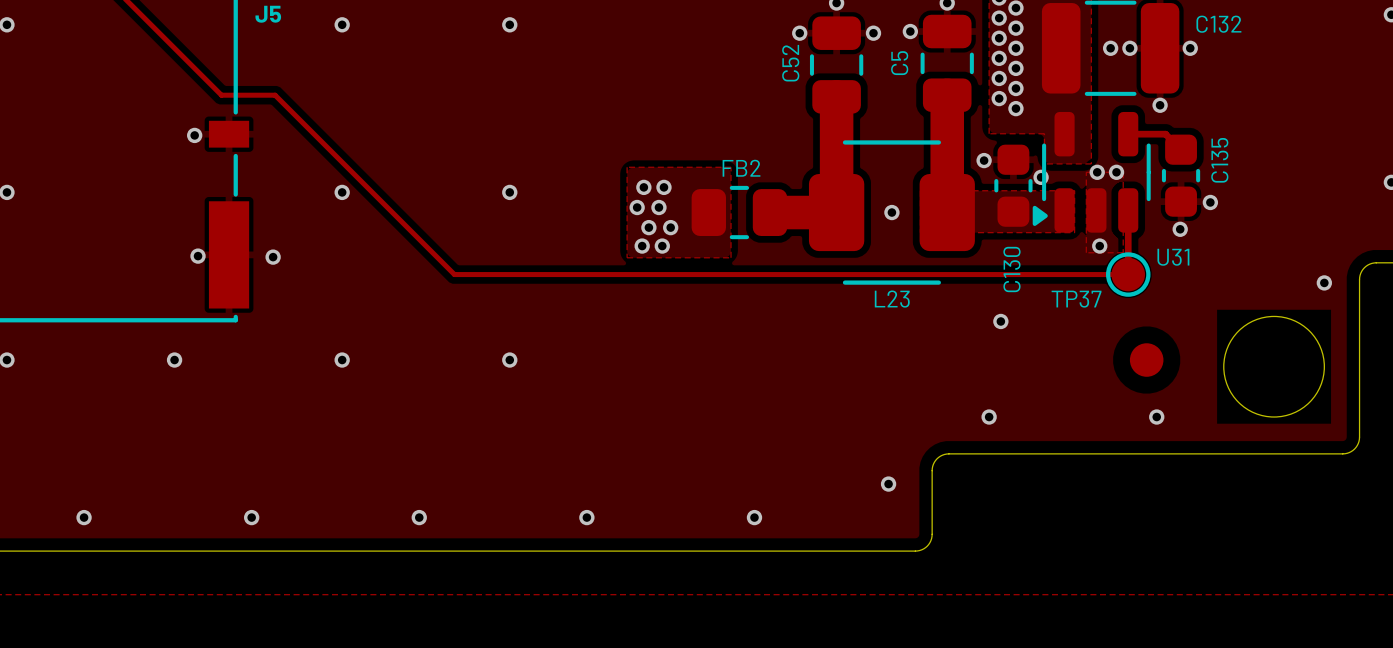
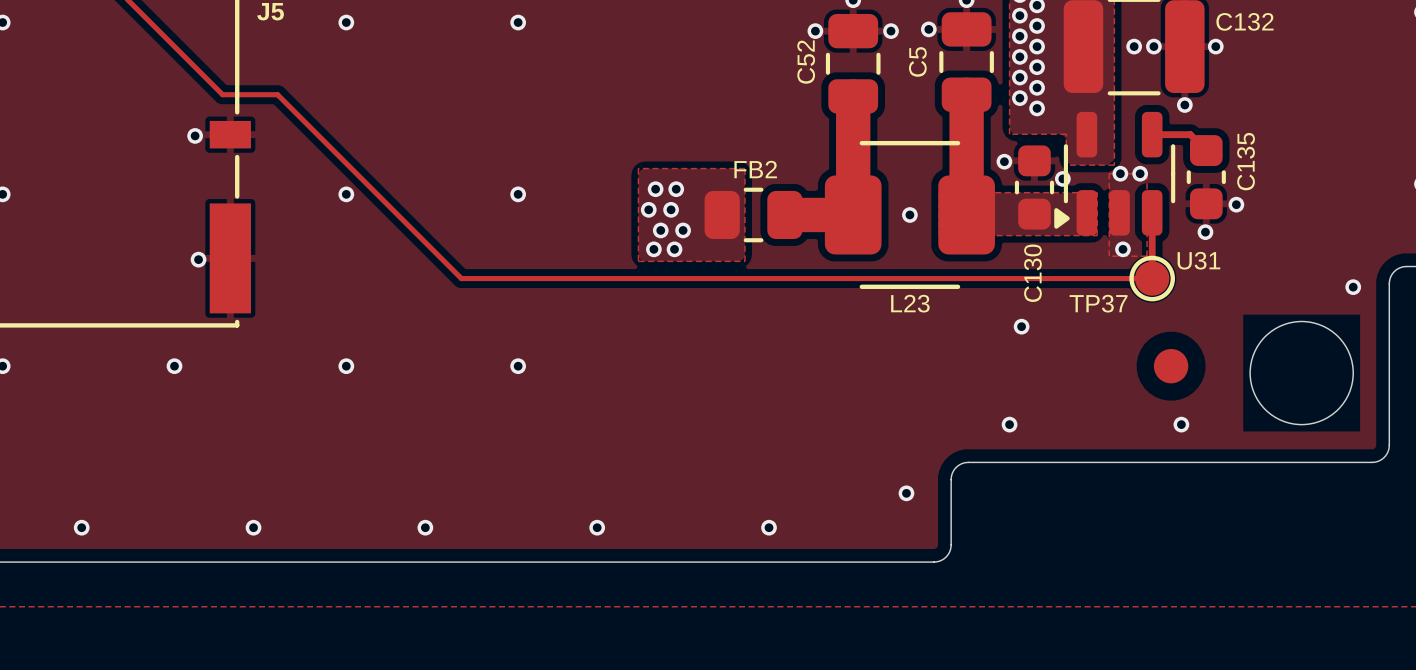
via: (273, 257) -> none

